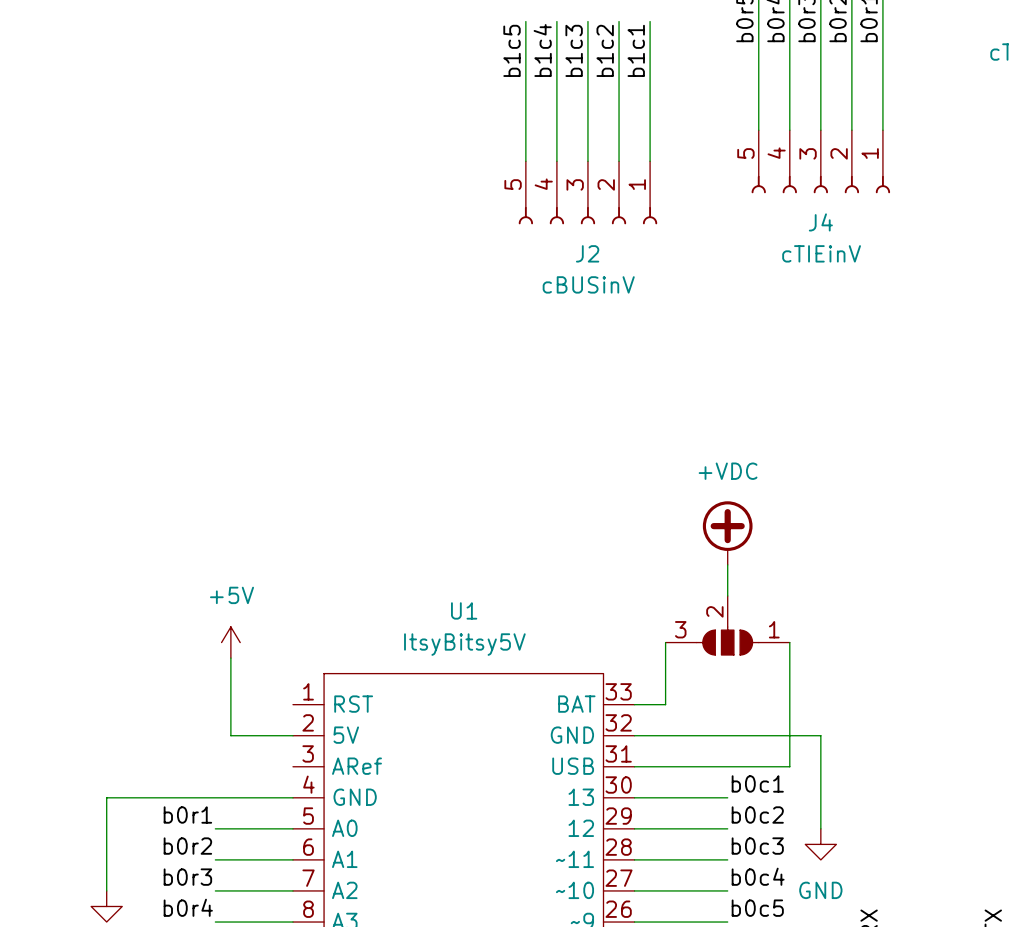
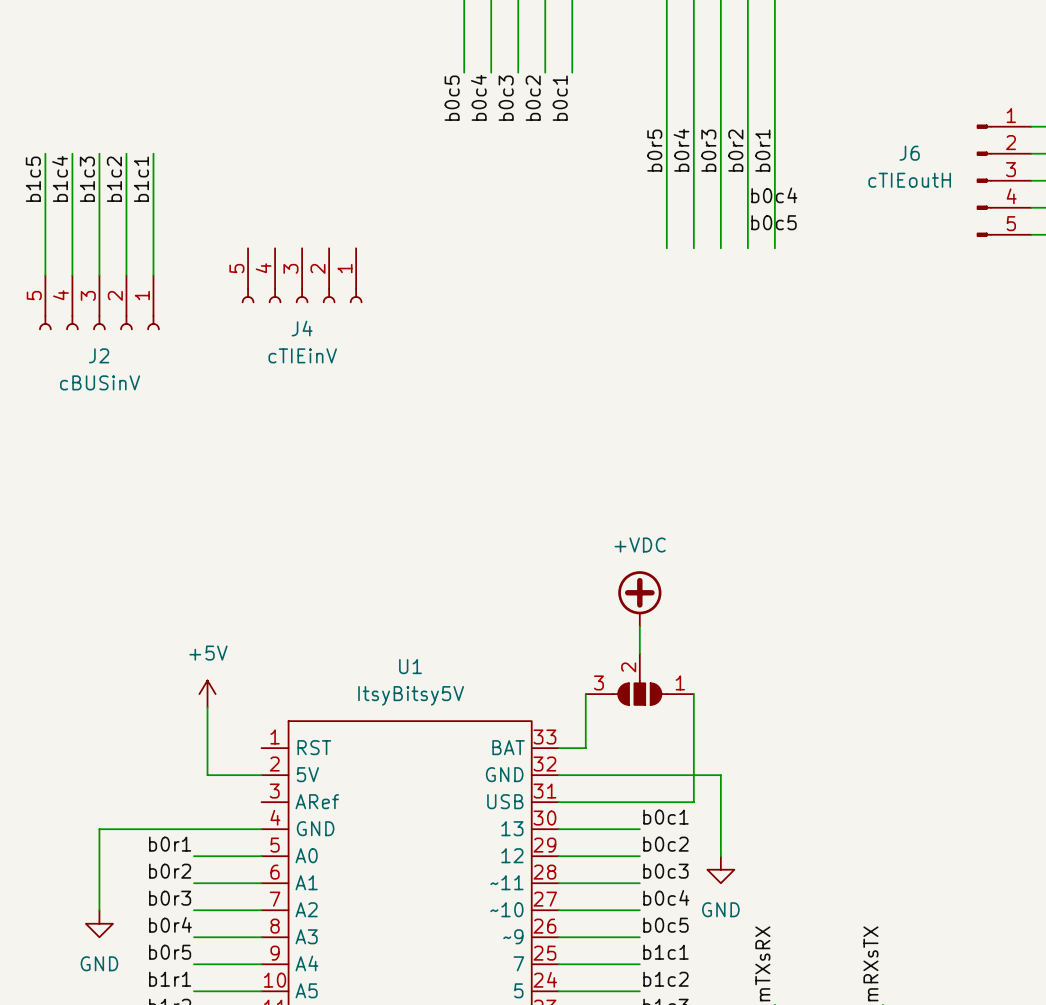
wire: none -> (45, 153) (45, 275)
wire: none -> (72, 153) (72, 275)
wire: none -> (99, 153) (99, 275)
wire: none -> (126, 153) (126, 275)
wire: none -> (153, 153) (153, 275)
wire: (525, 21) (525, 161) -> none
wire: (556, 21) (556, 161) -> none
wire: (587, 21) (587, 161) -> none
wire: (619, 21) (619, 161) -> none
wire: (650, 21) (650, 161) -> none
label: none -> b1c5 (33, 179)
label: none -> b1c4 (60, 178)
label: none -> b1c3 (87, 179)
label: none -> b1c2 (114, 179)
label: none -> b1c1 (141, 179)
label: b1c5 (512, 50) -> none
label: b1c4 (542, 50) -> none
label: b1c3 (574, 50) -> none
label: b1c2 (605, 50) -> none
label: b1c1 (636, 50) -> none
label: none -> b0c4 (774, 195)
label: none -> b0c5 (774, 222)
J4 position: (820, 161) -> (302, 275)
J2 position: (587, 192) -> (99, 302)

